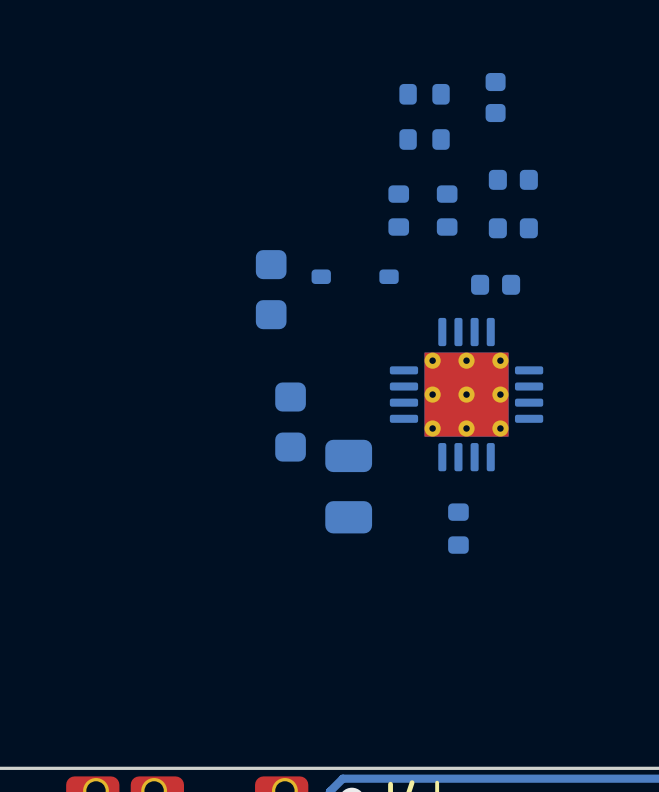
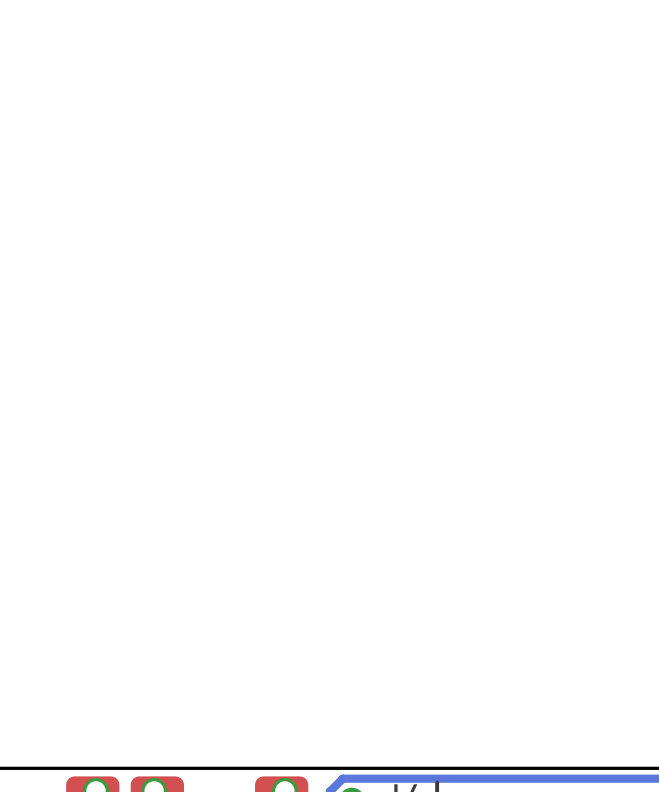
part: (424, 94) -> none
part: (495, 97) -> none
part: (424, 139) -> none
part: (513, 179) -> none
part: (398, 210) -> none
part: (447, 210) -> none
part: (513, 228) -> none
part: (355, 276) -> none
part: (495, 284) -> none
part: (271, 289) -> none
part: (466, 394) -> none
part: (290, 422) -> none
part: (348, 486) -> none
part: (458, 528) -> none

